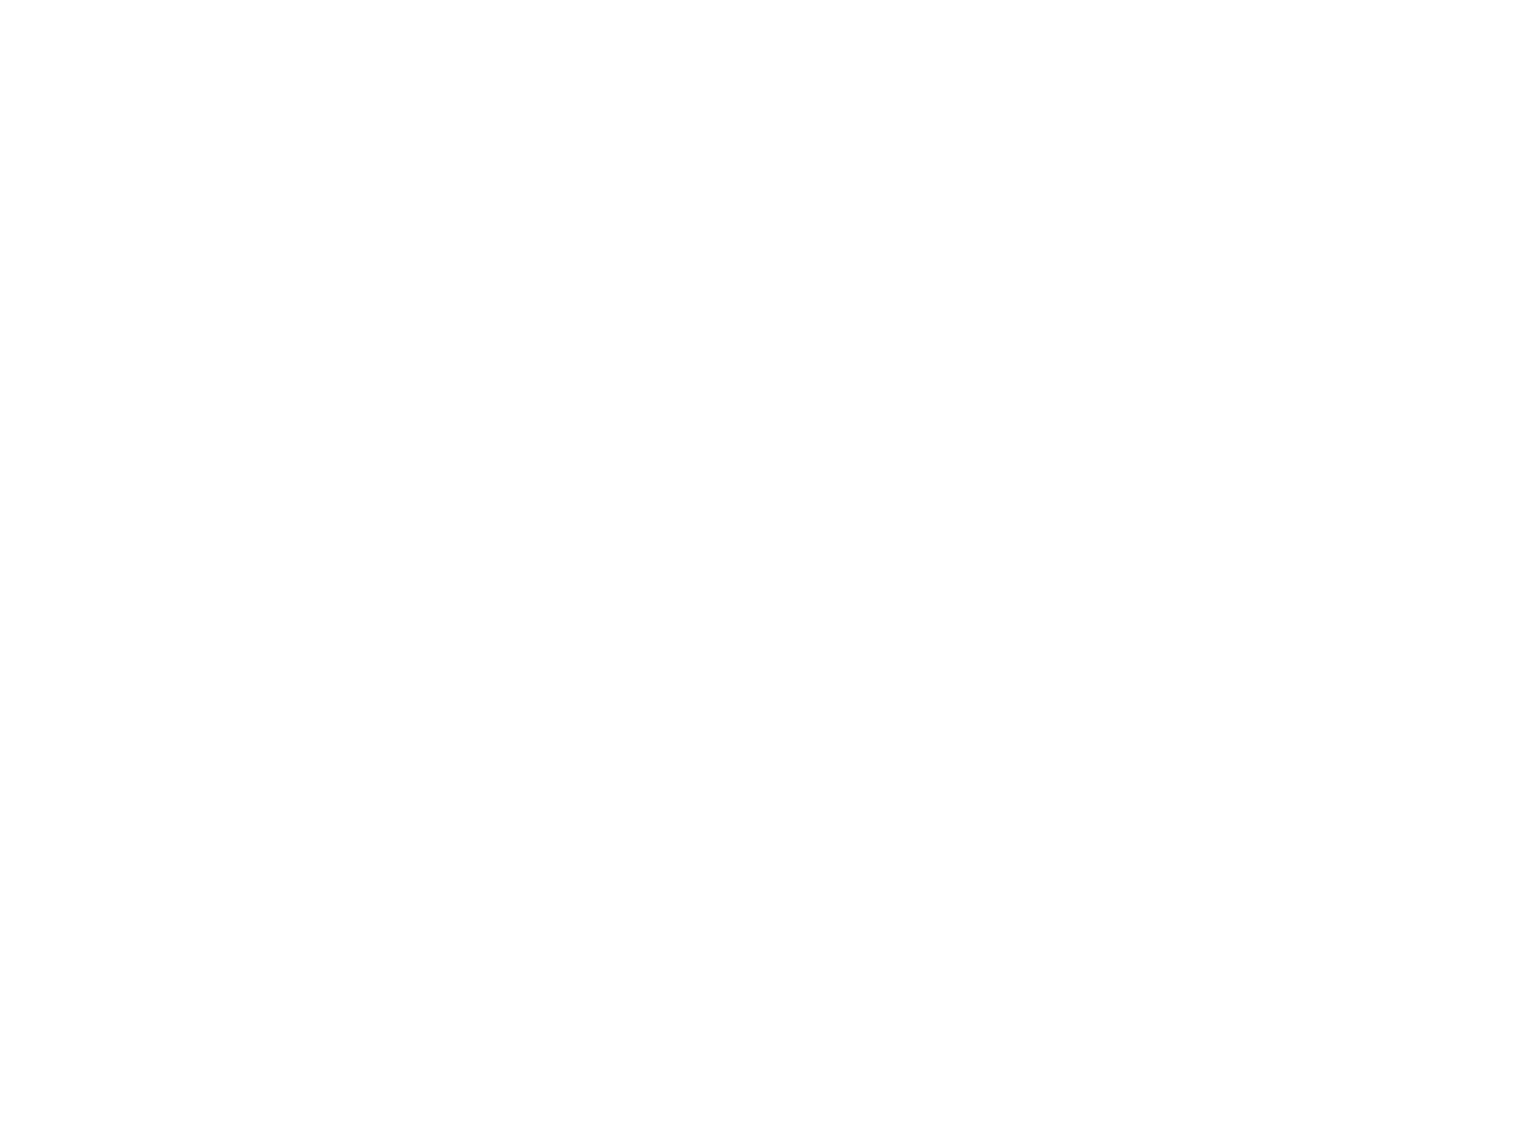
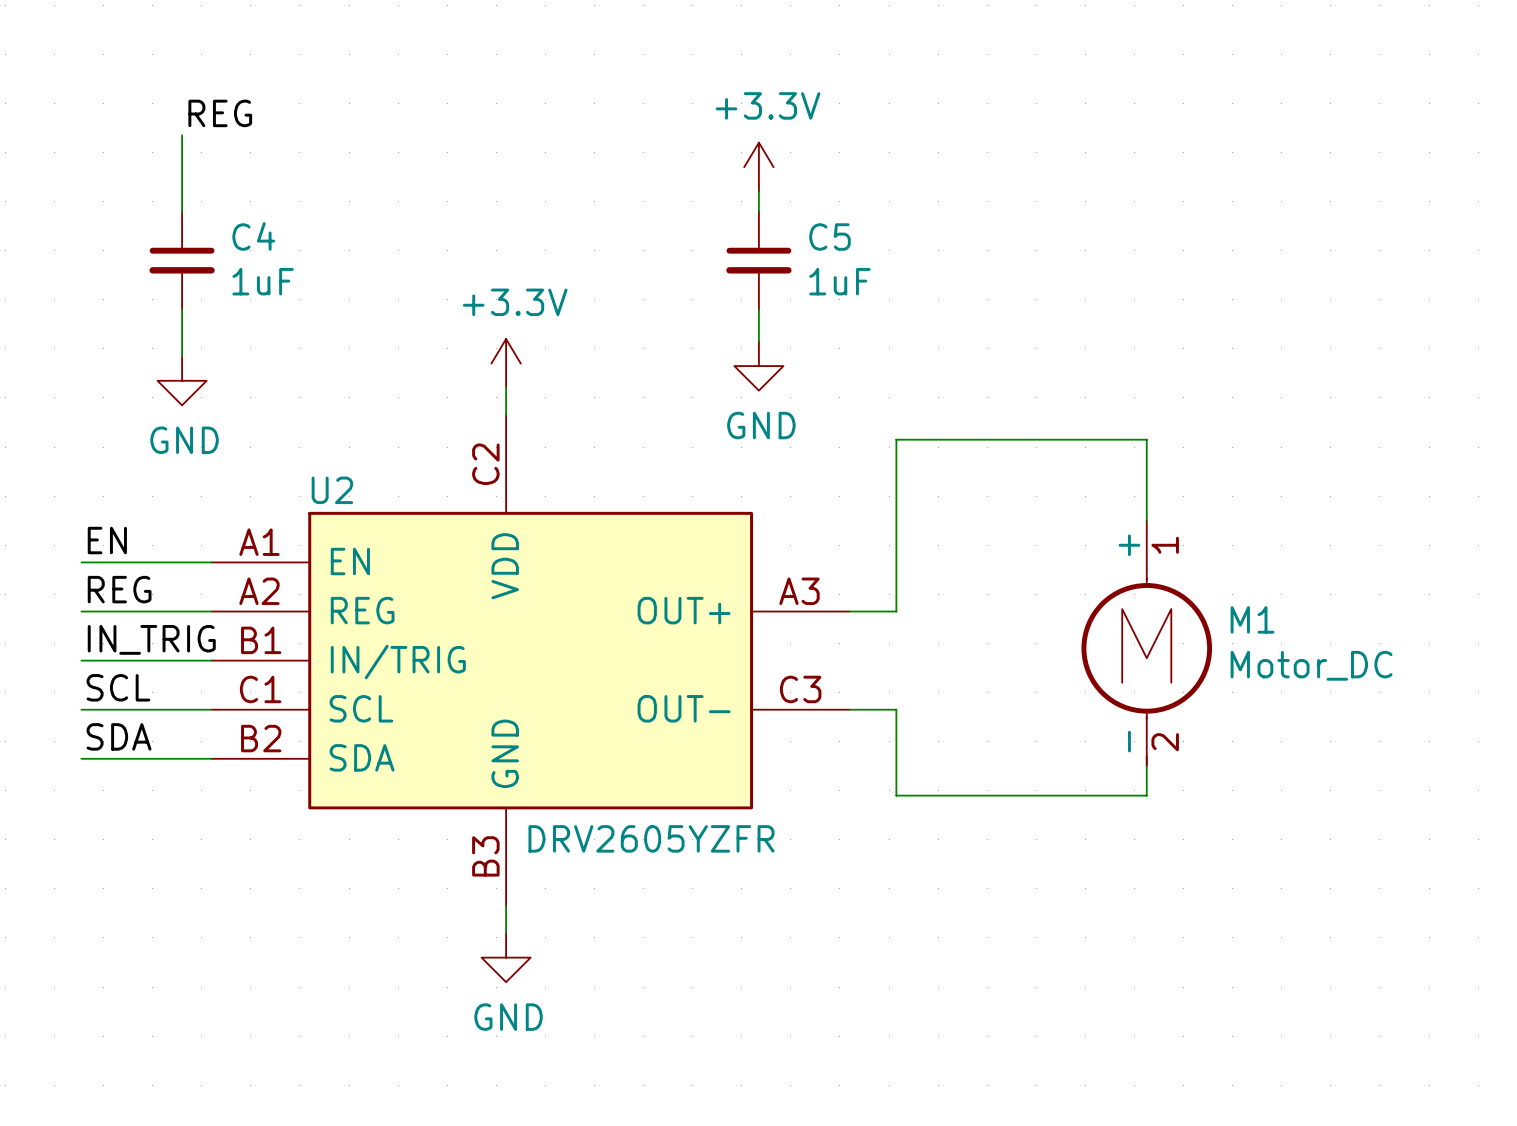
label: none -> REG (220, 113)
wire: none -> (182, 135) (182, 211)
power symbol: none -> +3.3V (758, 167)
wire: none -> (758, 191) (758, 211)
C4: none -> 1uF (182, 260)
C5: none -> 1uF (758, 260)
wire: none -> (182, 309) (182, 356)
wire: none -> (758, 309) (758, 341)
power symbol: none -> +3.3V (506, 363)
power symbol: none -> GND (758, 366)
power symbol: none -> GND (182, 380)
wire: none -> (506, 388) (506, 415)
wire: none -> (1146, 520) (1146, 439) (896, 439) (896, 611) (849, 611)
label: none -> EN (107, 540)
wire: none -> (81, 562) (211, 562)
label: none -> REG (119, 589)
wire: none -> (81, 611) (211, 611)
label: none -> IN_TRIG (151, 639)
M1: none -> Motor_DC (1146, 643)
wire: none -> (81, 660) (211, 660)
U2: none -> DRV2605YZFR (530, 660)
label: none -> SCL (118, 687)
wire: none -> (81, 709) (211, 709)
wire: none -> (849, 709) (896, 709) (896, 795) (1146, 795) (1146, 766)
label: none -> SDA (119, 736)
wire: none -> (81, 758) (211, 758)
wire: none -> (506, 906) (506, 933)
power symbol: none -> GND (506, 957)

